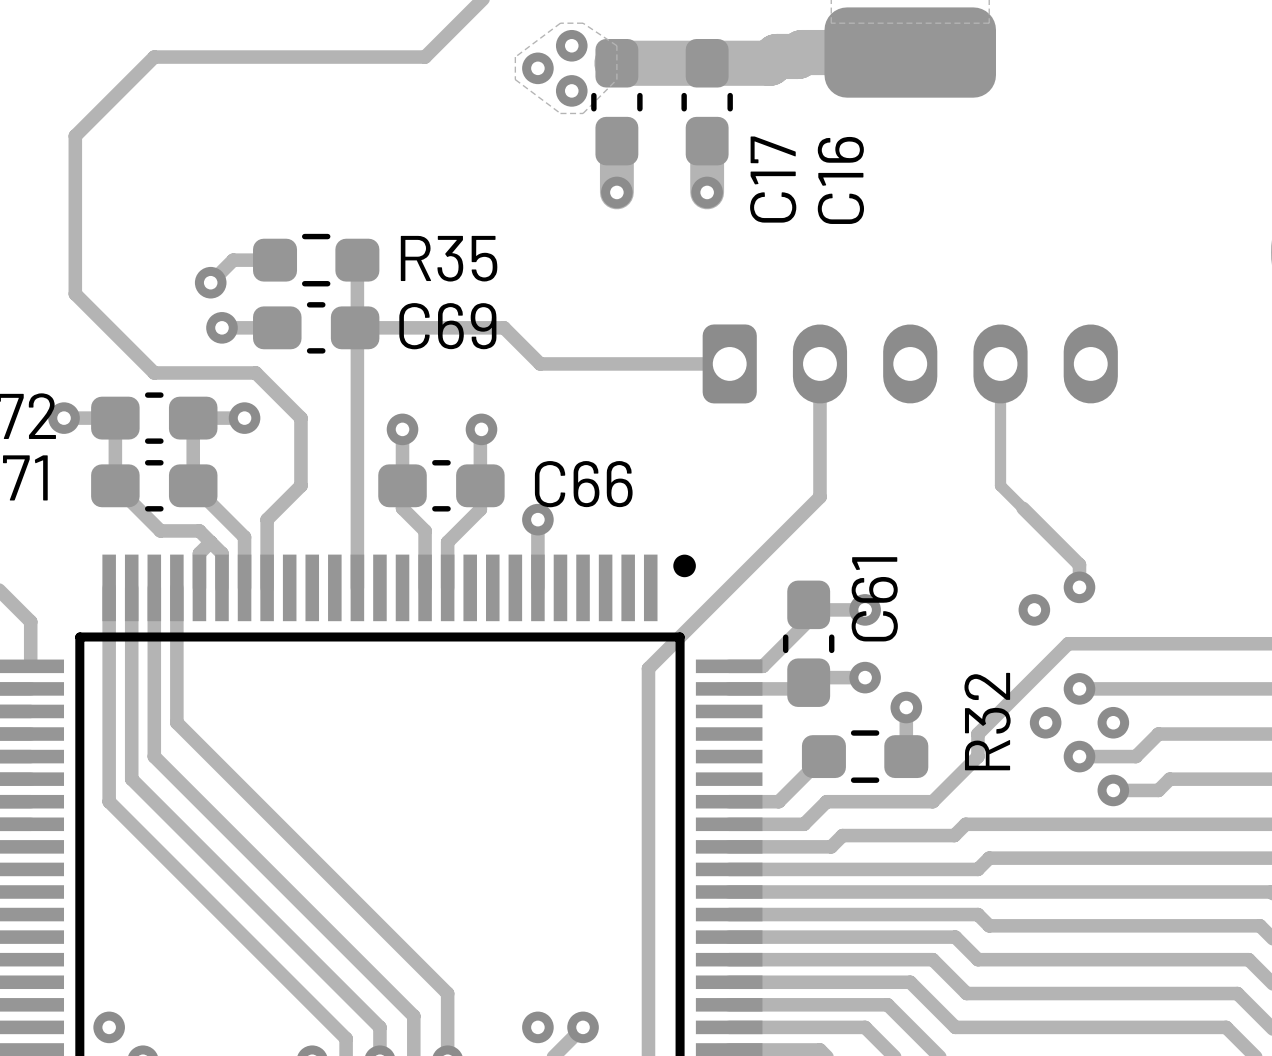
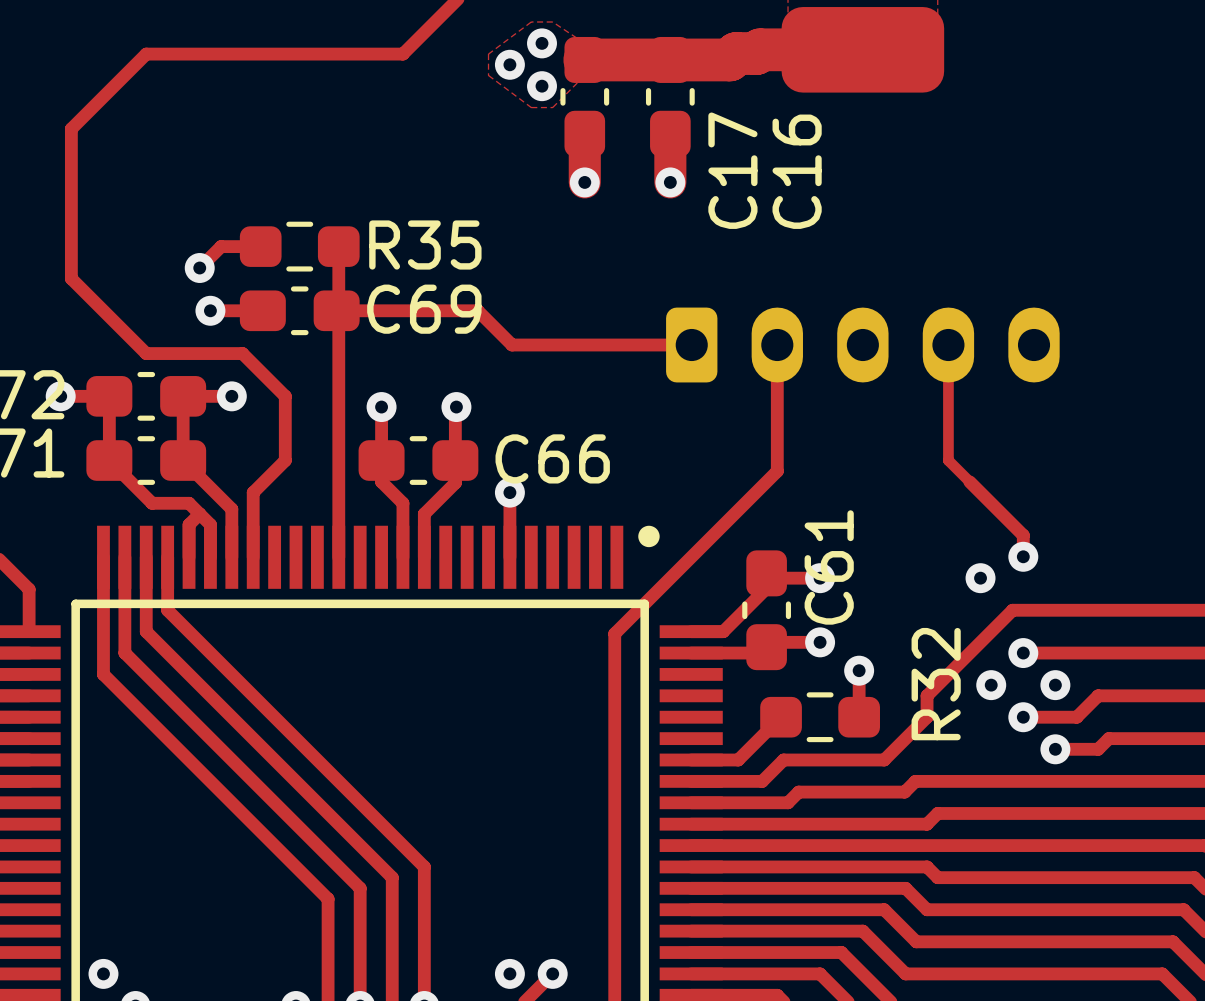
track: (176, 643) (176, 722) (447, 993) -> (167, 610) (424, 866) (424, 941)
track: (154, 666) (154, 756) -> (103, 674) (146, 717)
track: none -> (146, 631) (392, 877) (392, 963)
track: (131, 688) (131, 779) (379, 1027) -> (124, 653) (360, 888) (360, 973)
track: (109, 711) (109, 801) (346, 1038) -> none
track: (346, 948) (413, 1016) -> (328, 899) (328, 984)

